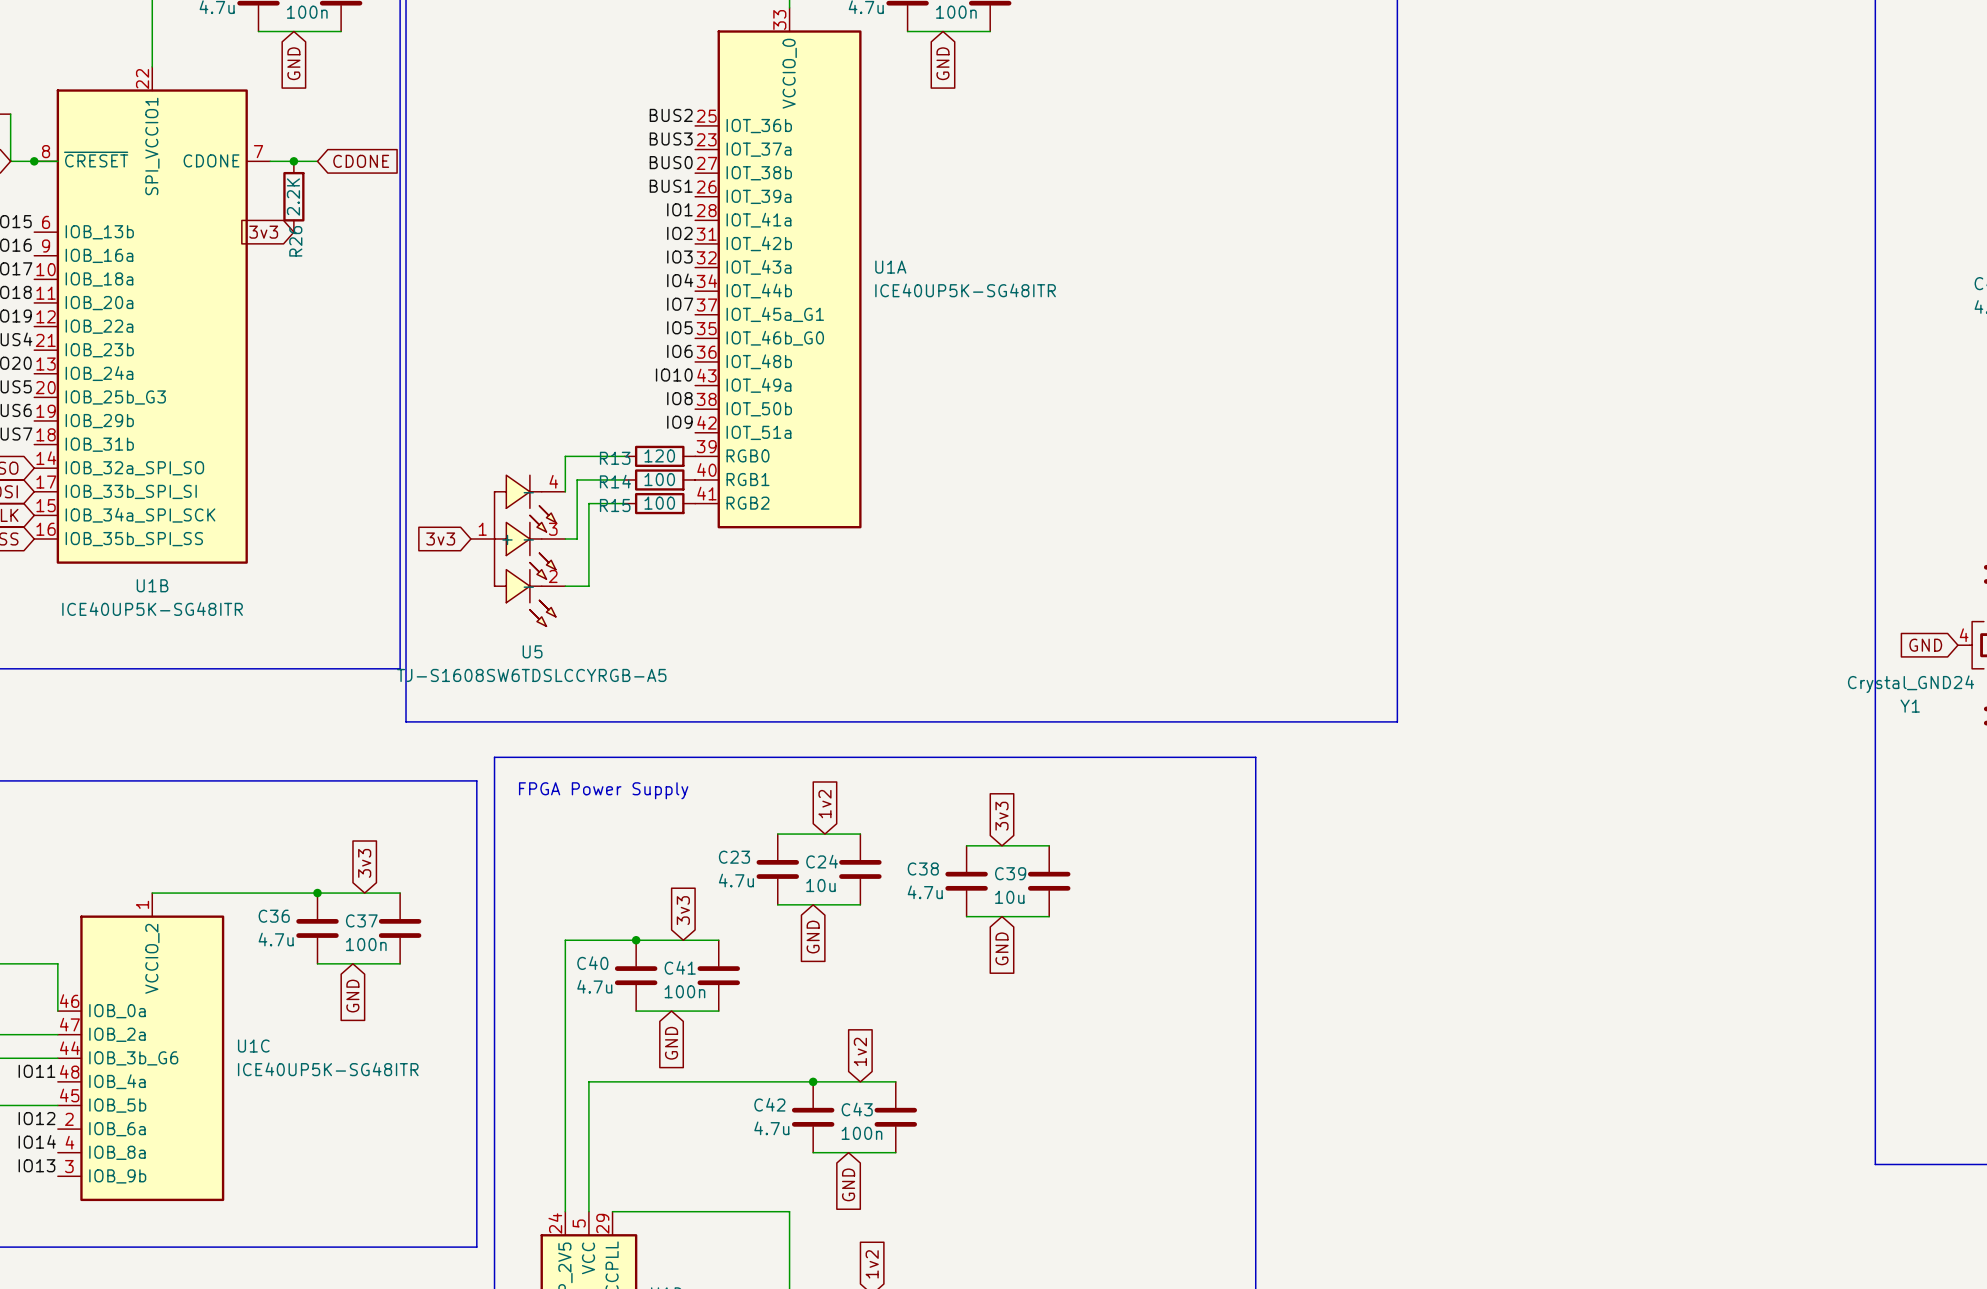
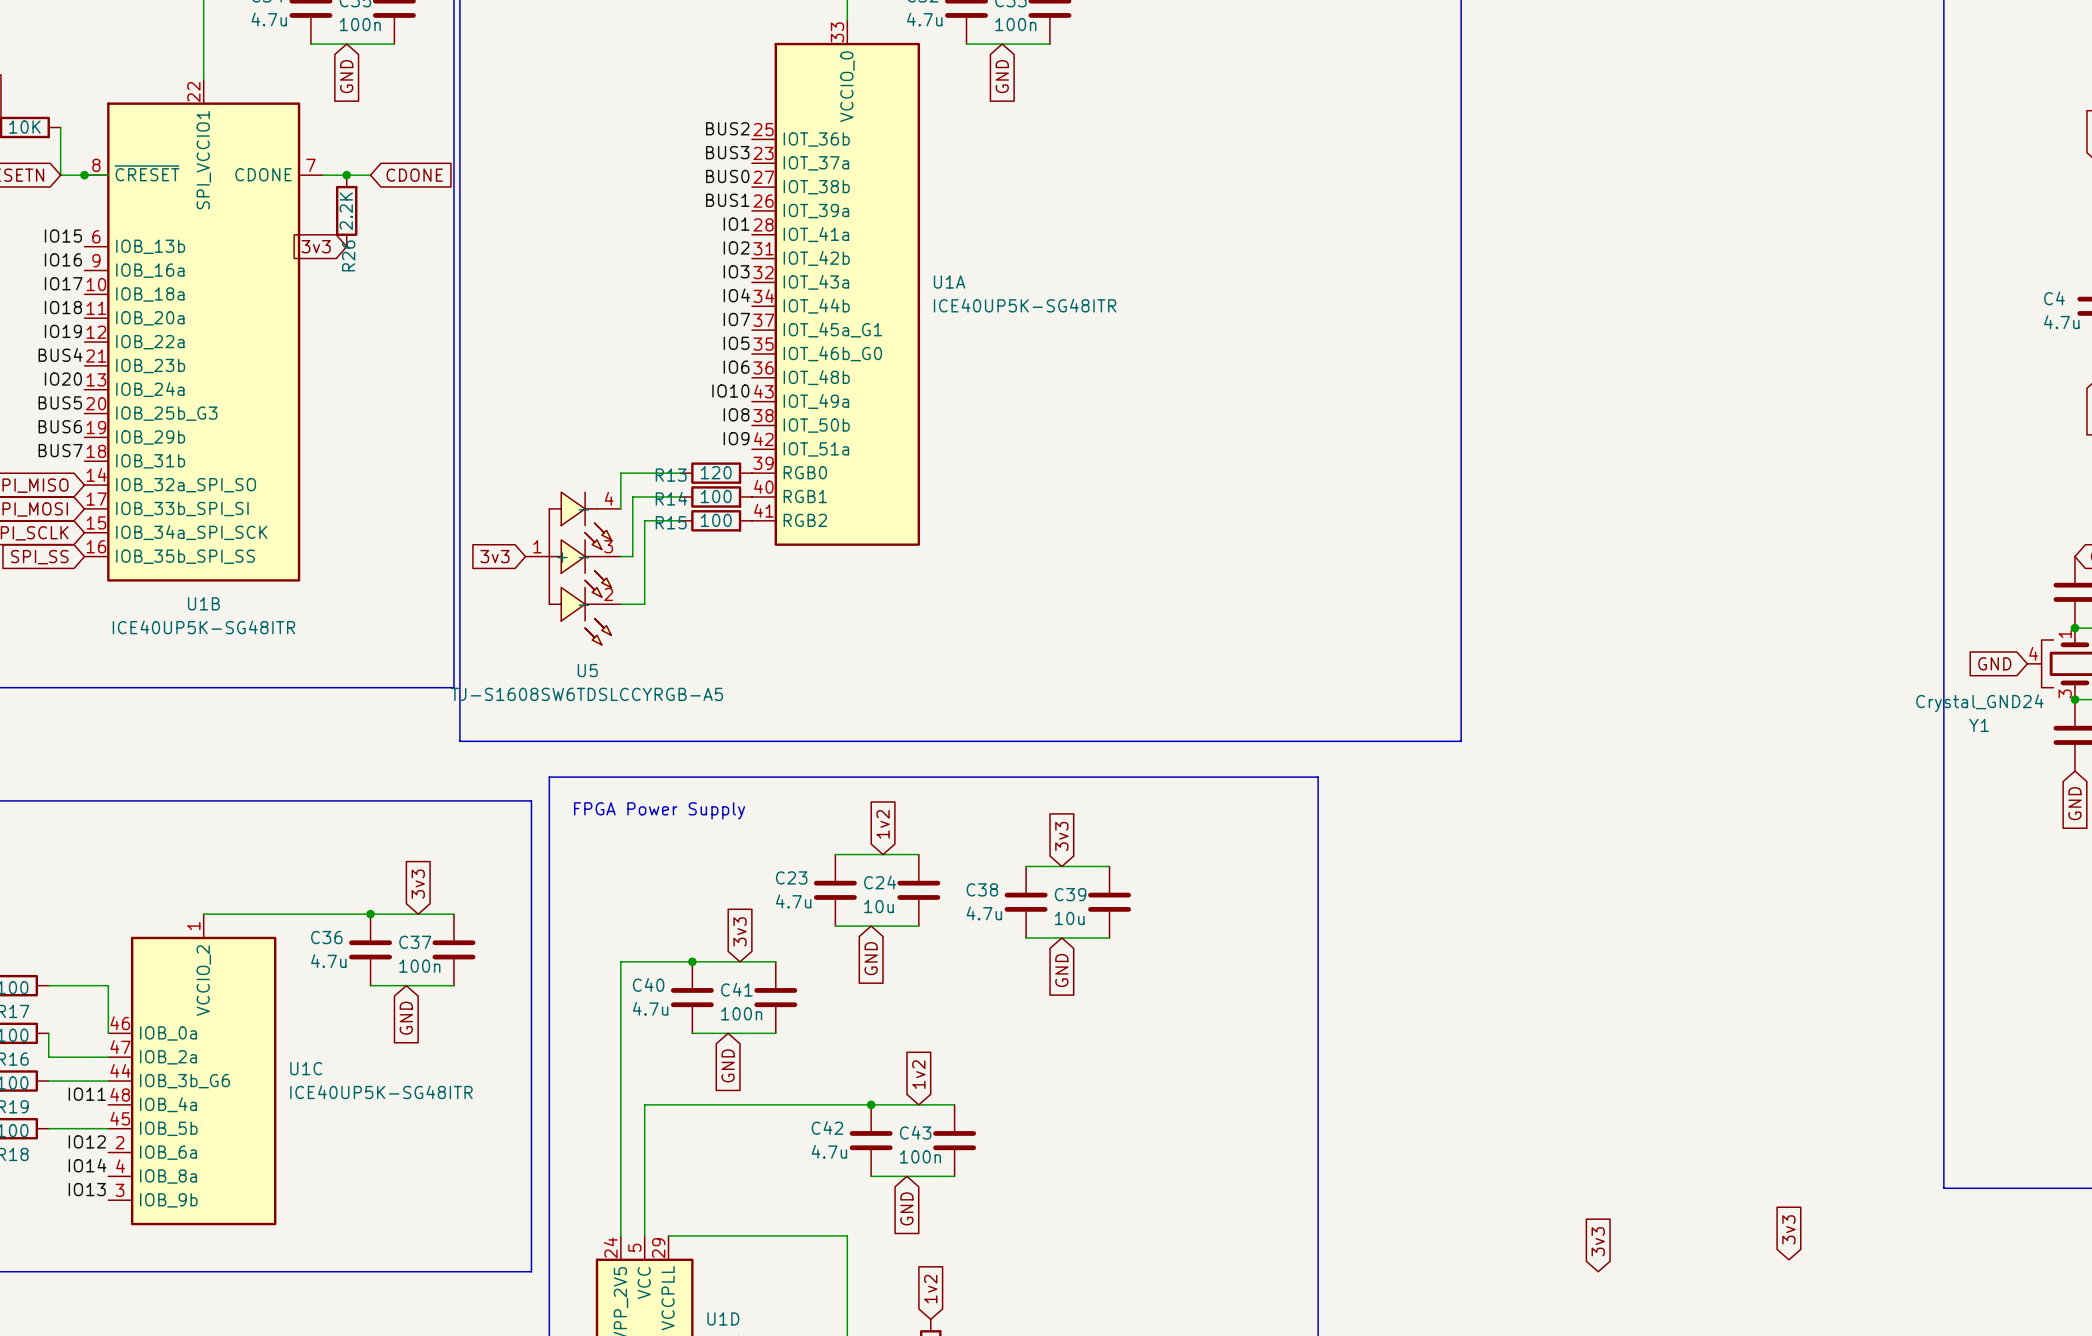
global label: none -> 3v3 (1788, 1229)
global label: none -> 3v3 (1598, 1241)

